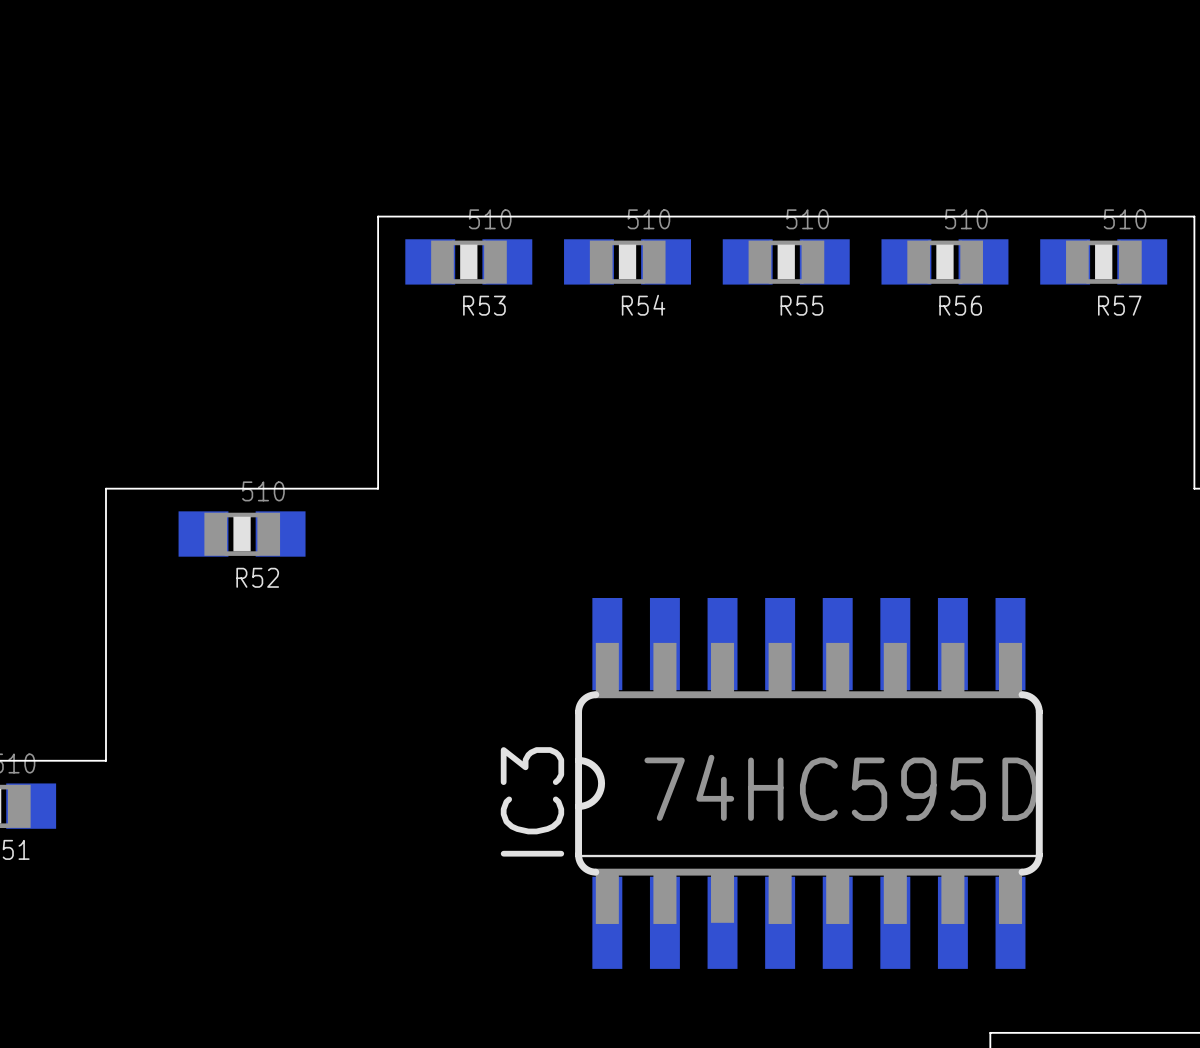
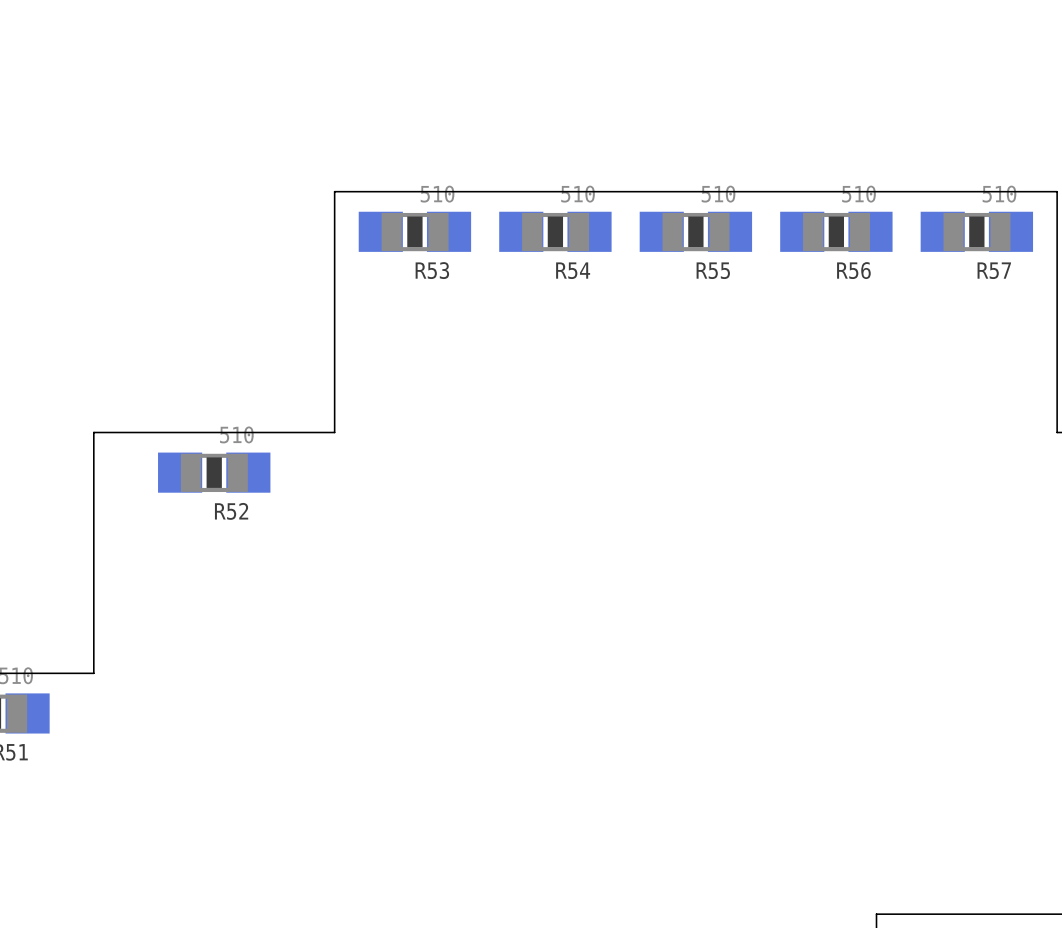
IC3: 74HC595D (808, 783) -> none

